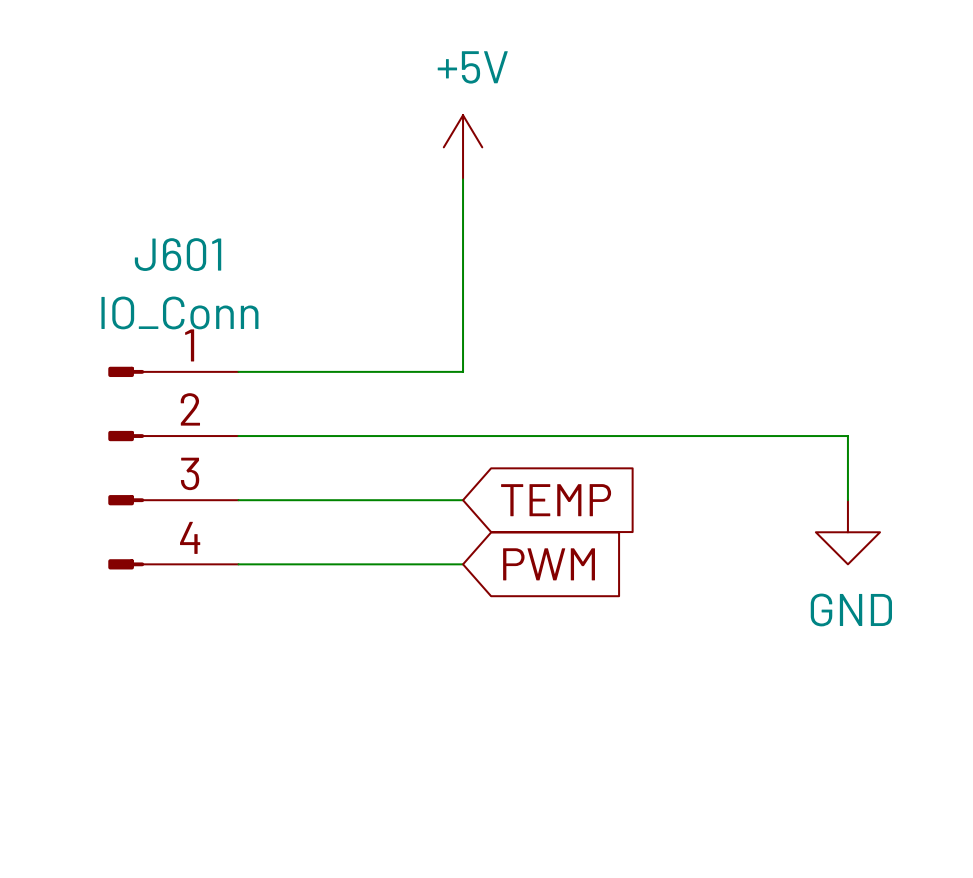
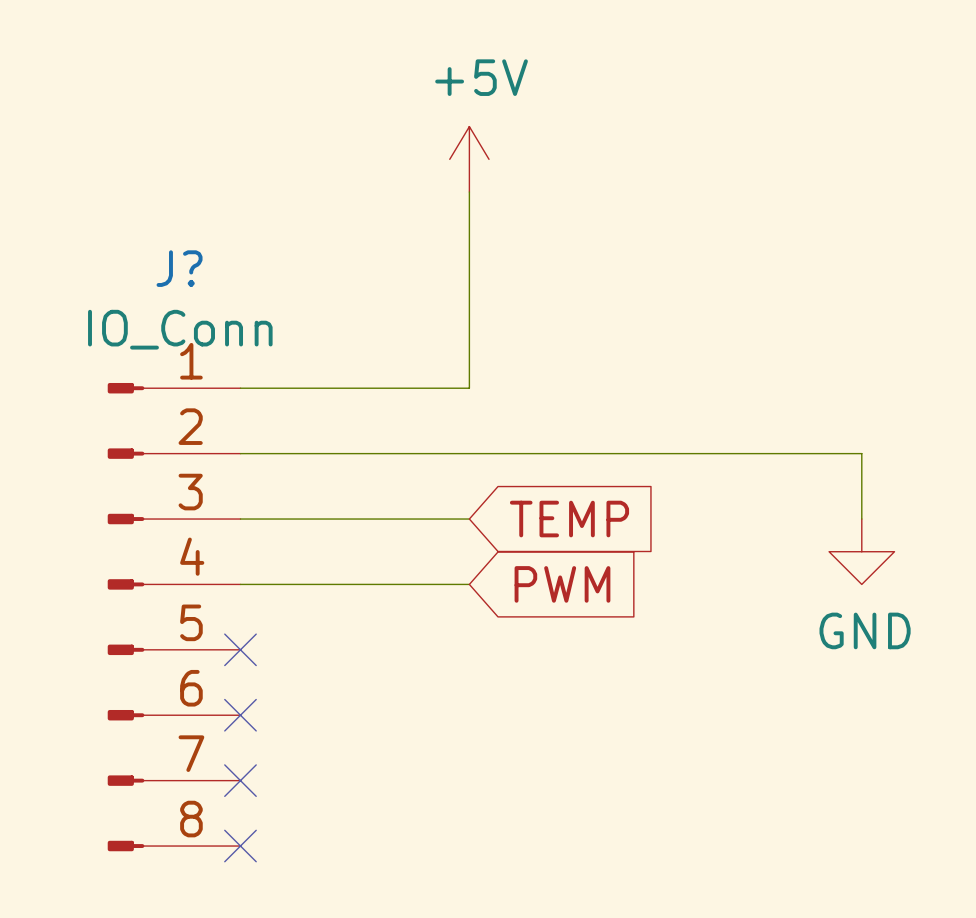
J601: IO_Conn (173, 468) -> none
J?: none -> IO_Conn (174, 617)
no-connect mark: none -> (240, 649)
no-connect mark: none -> (240, 715)
no-connect mark: none -> (240, 780)
no-connect mark: none -> (240, 846)

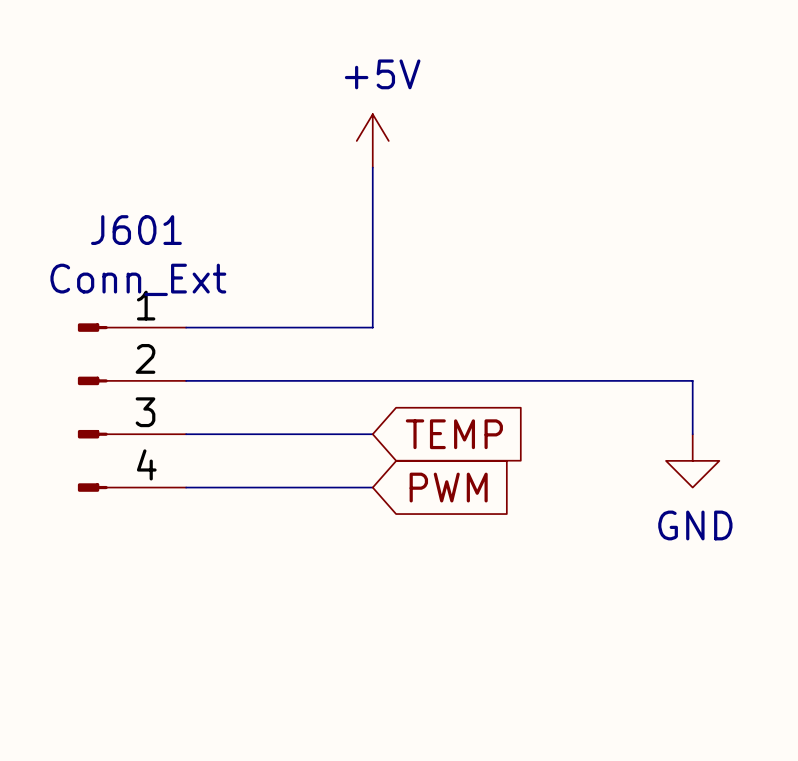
J601: none -> Conn_Ext (132, 407)
J?: IO_Conn (174, 617) -> none
no-connect mark: (240, 649) -> none
no-connect mark: (240, 715) -> none
no-connect mark: (240, 780) -> none
no-connect mark: (240, 846) -> none

